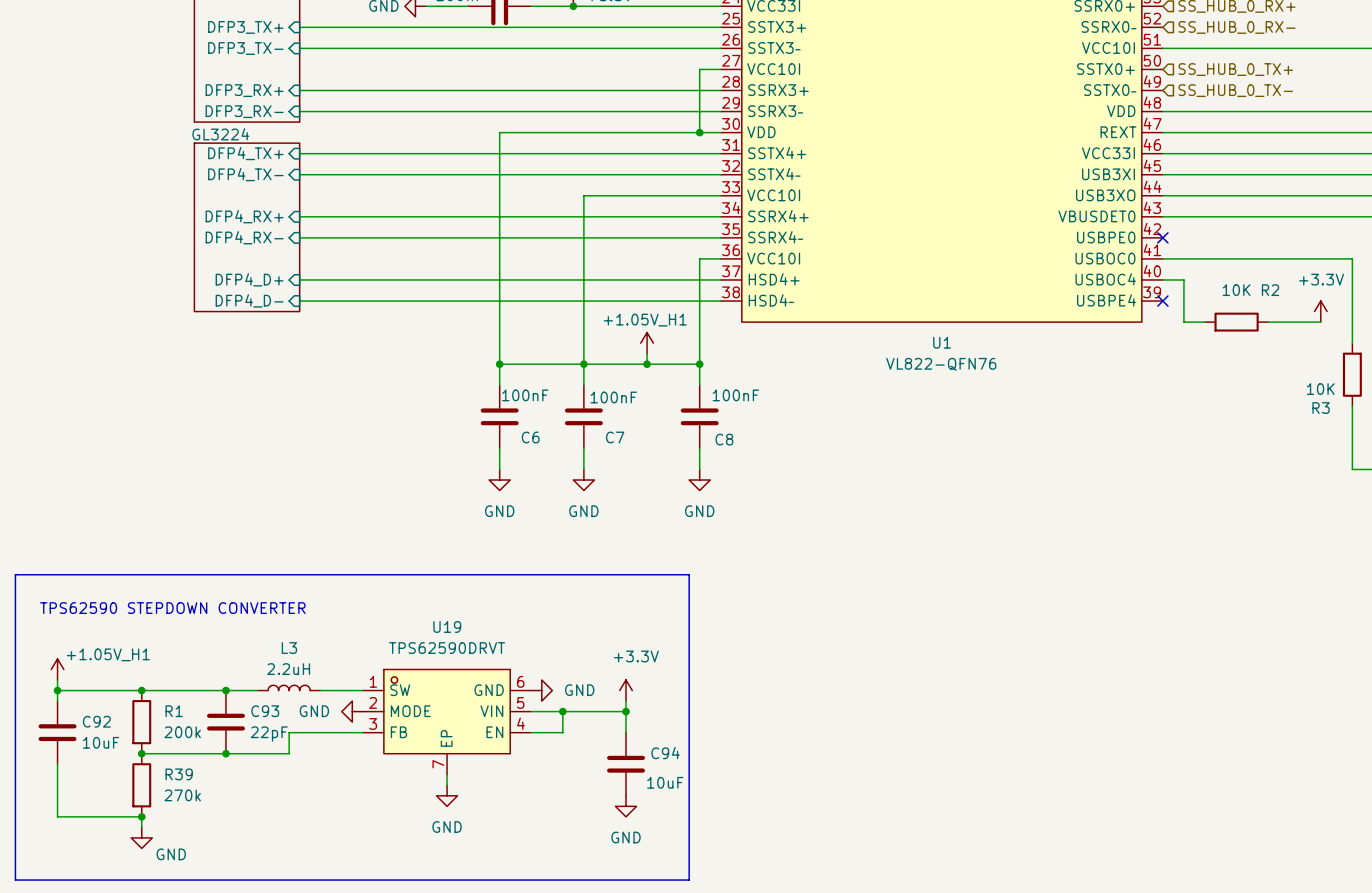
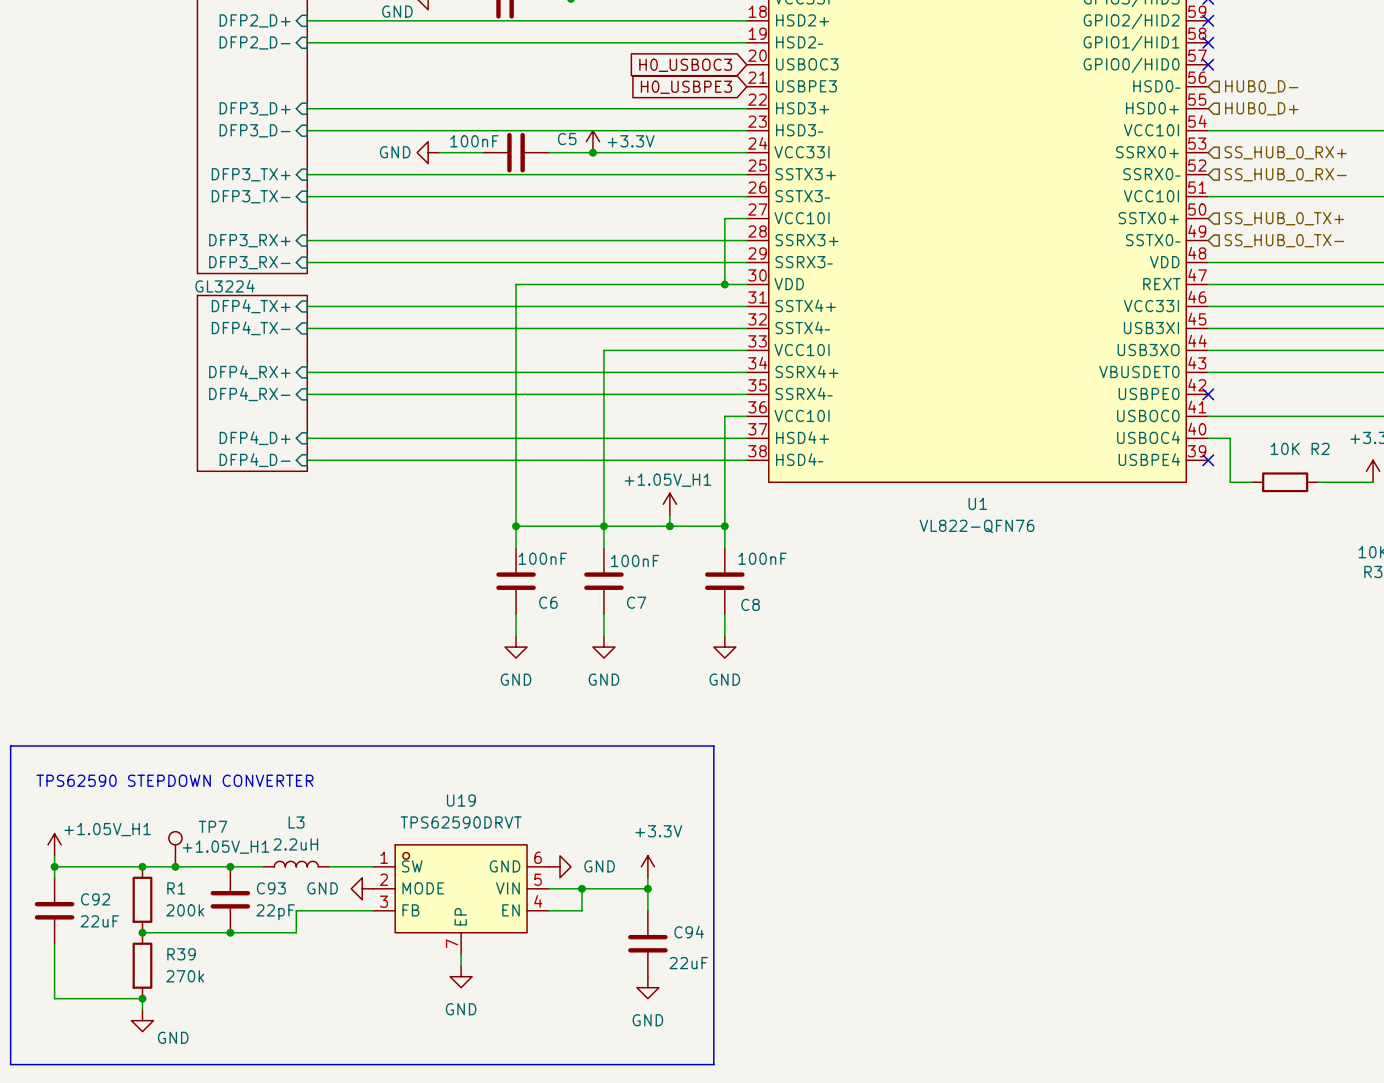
TP7: none -> +1.05V_H1 (175, 849)
junction: none -> (175, 866)
C92 value: 10uF (101, 742) -> 22uF (99, 921)
C94 value: 10uF (665, 782) -> 22uF (688, 963)

